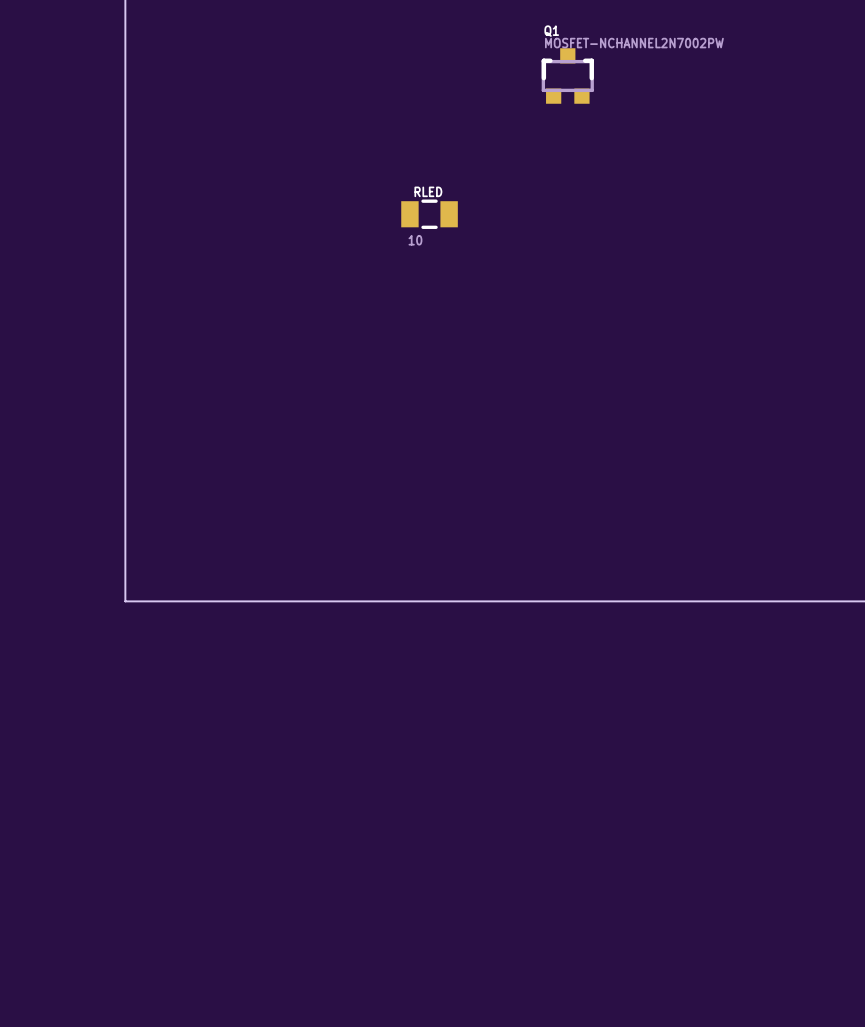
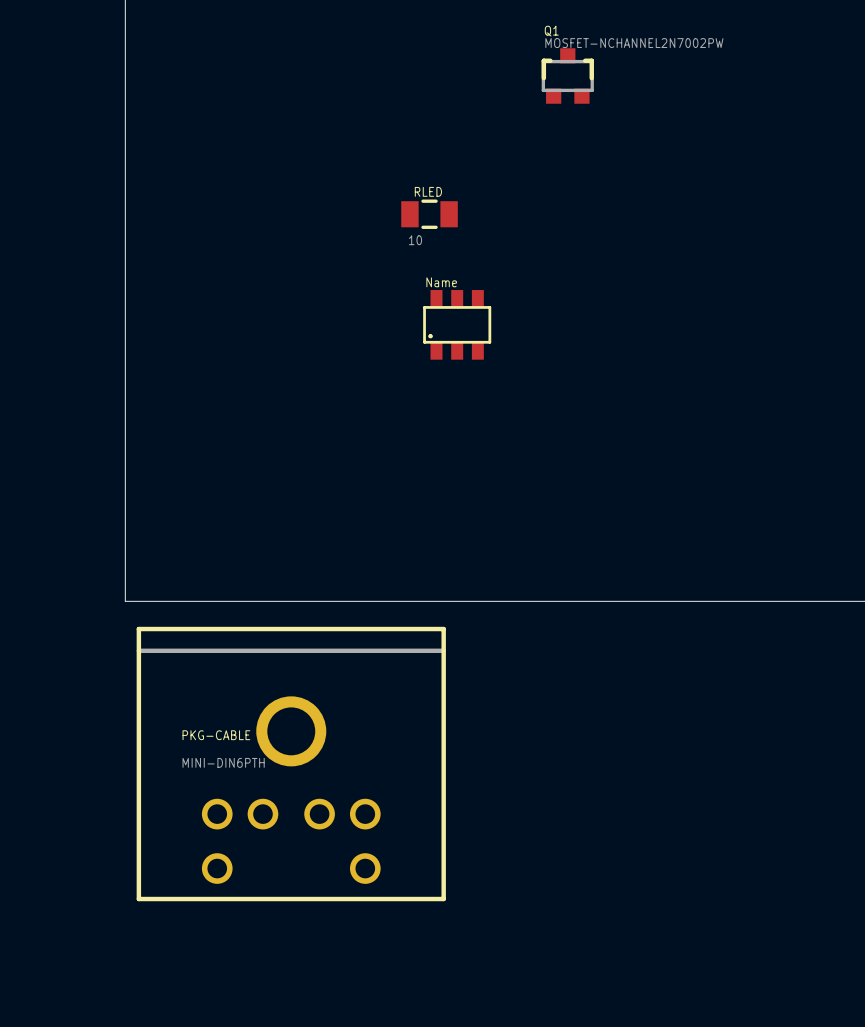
part: none -> (457, 324)
PKG-CABLE: none -> MINI-DIN6PTH (291, 764)

